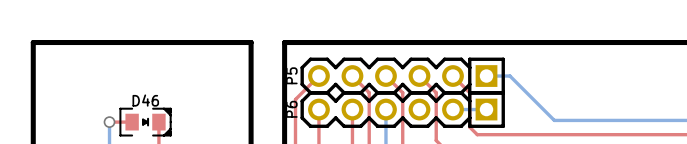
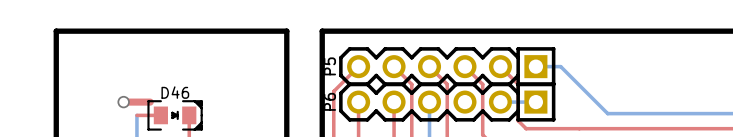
top track: none -> (123, 102) (150, 102)
via position: (109, 122) -> (123, 102)

